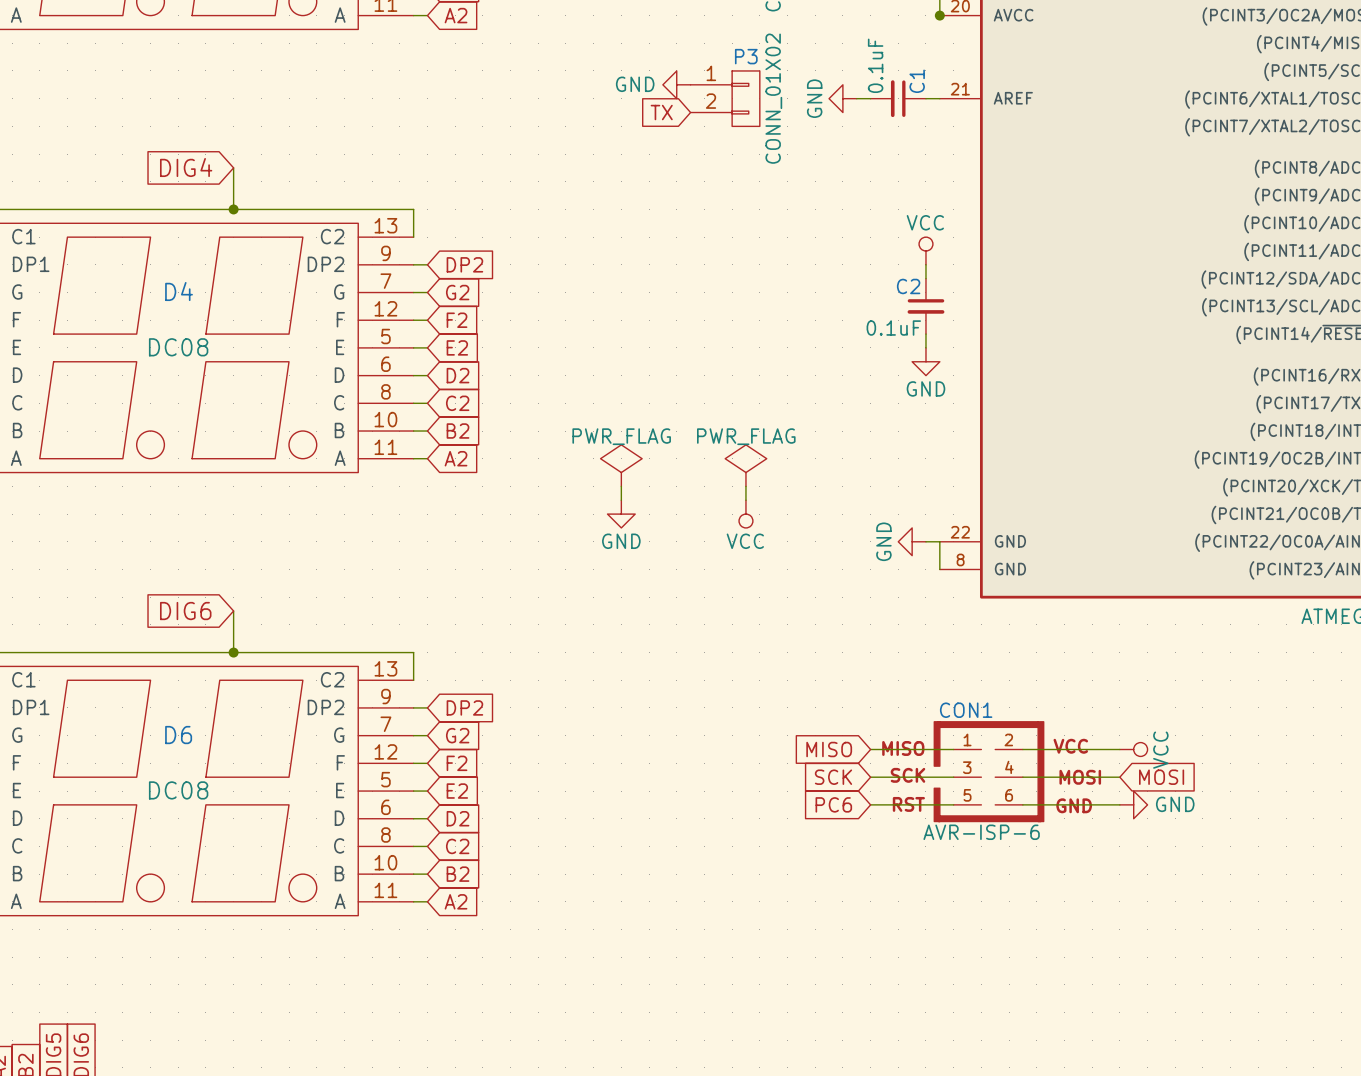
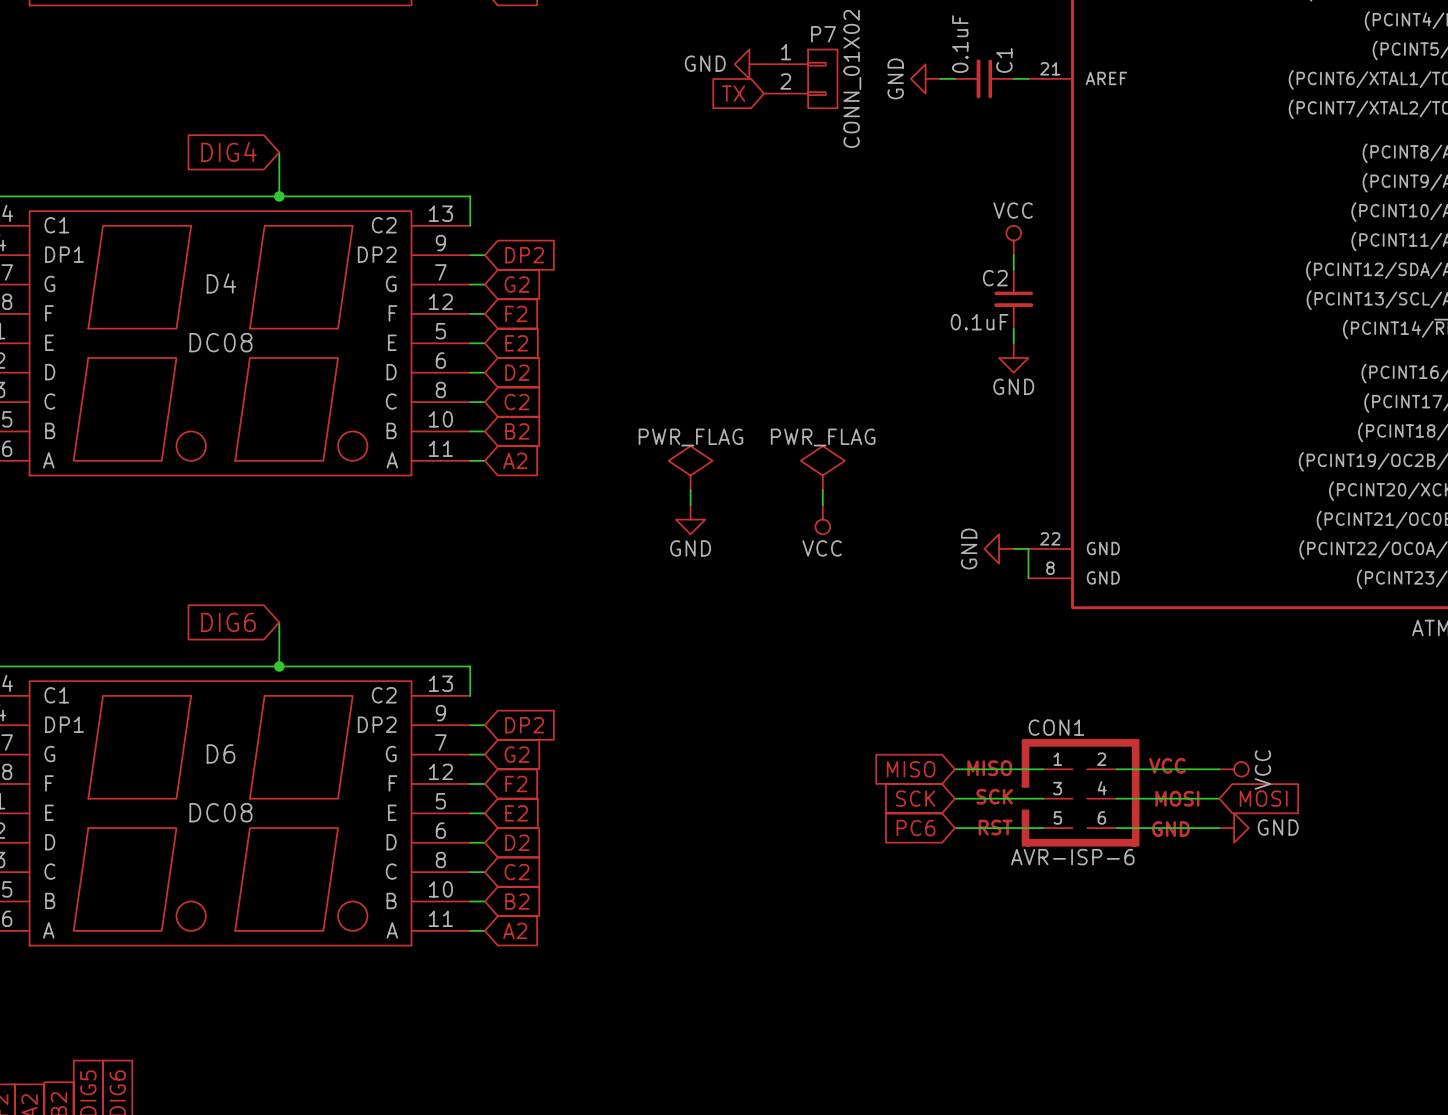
P3 name: P3 (746, 56) -> P7 (823, 34)

